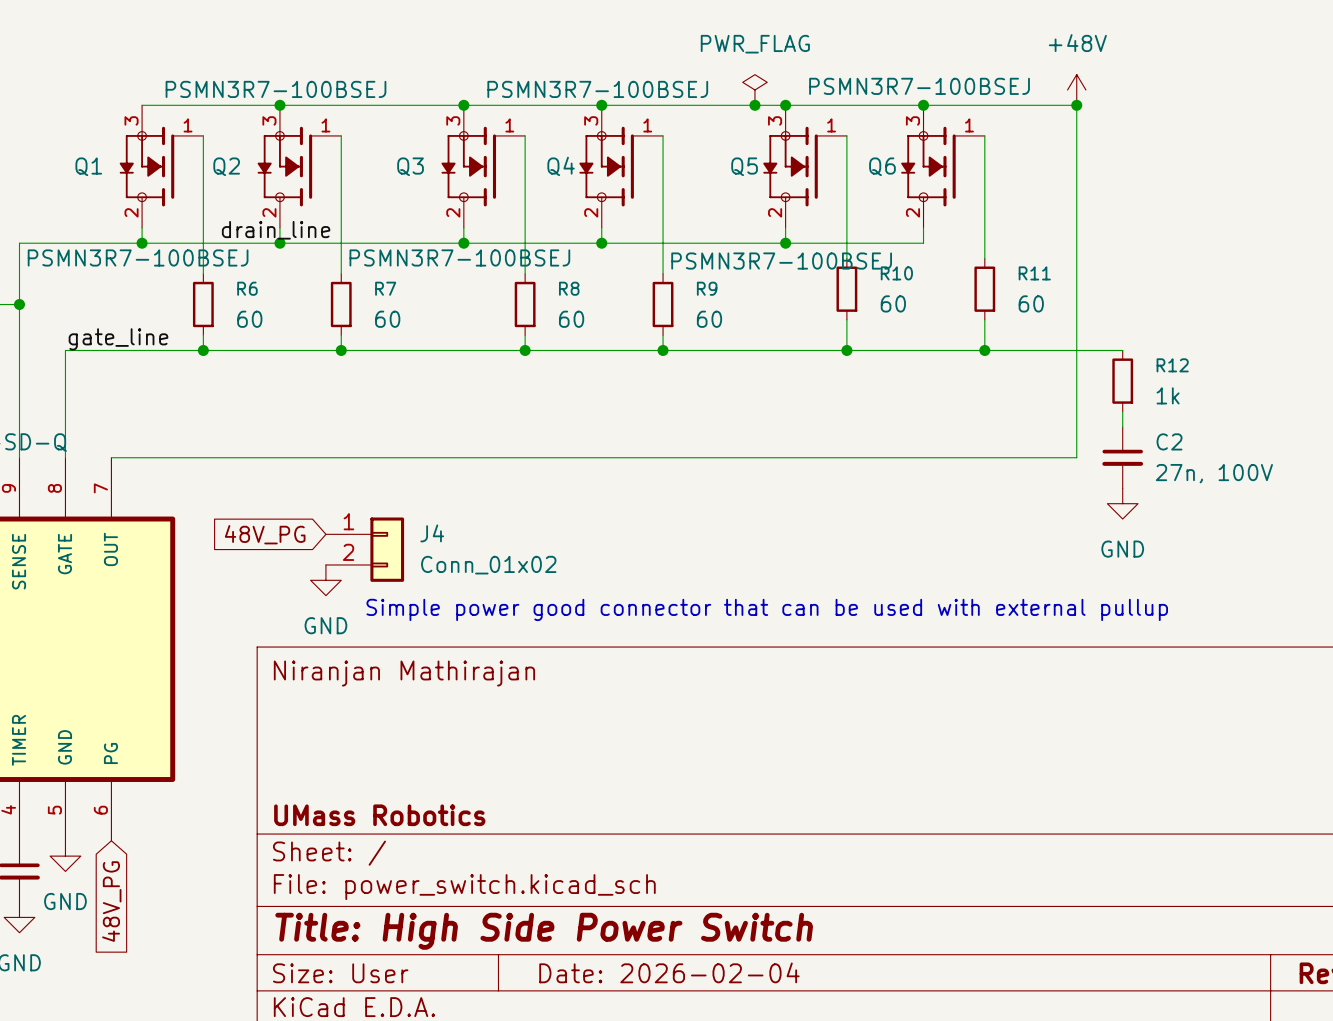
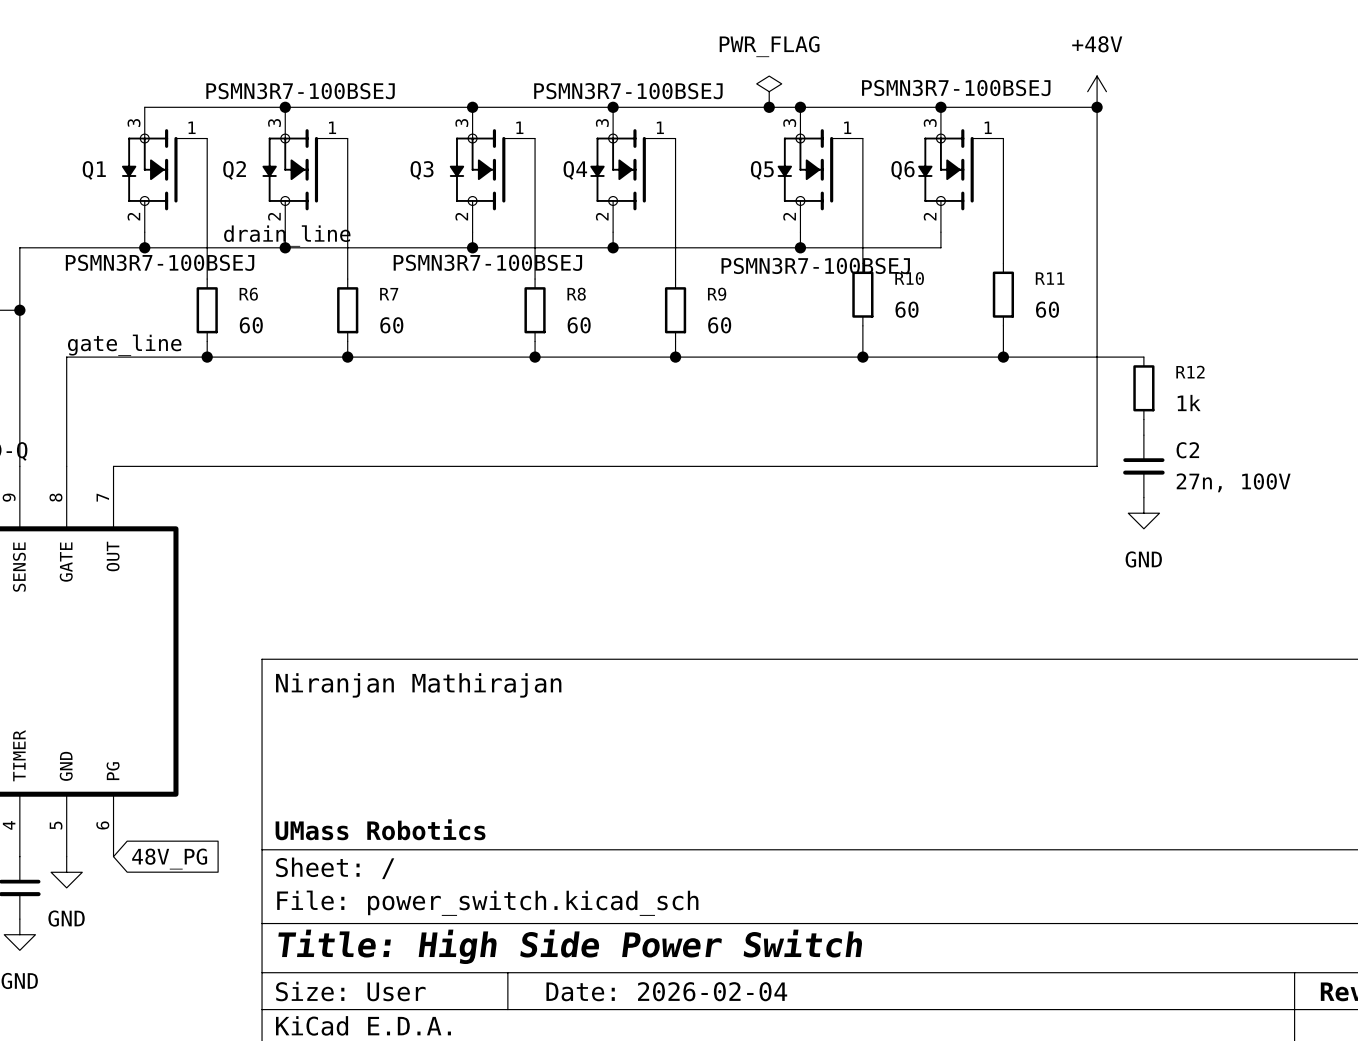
global label: 48V_PG (265, 534) -> none
J4: Conn_01x02 (365, 549) -> none
power symbol: GND (325, 580) -> none
text: Simple power good connector that can be used with external pullup (767, 609) -> none
global label rotation: 0° (111, 901) -> 90° counterclockwise (169, 859)

